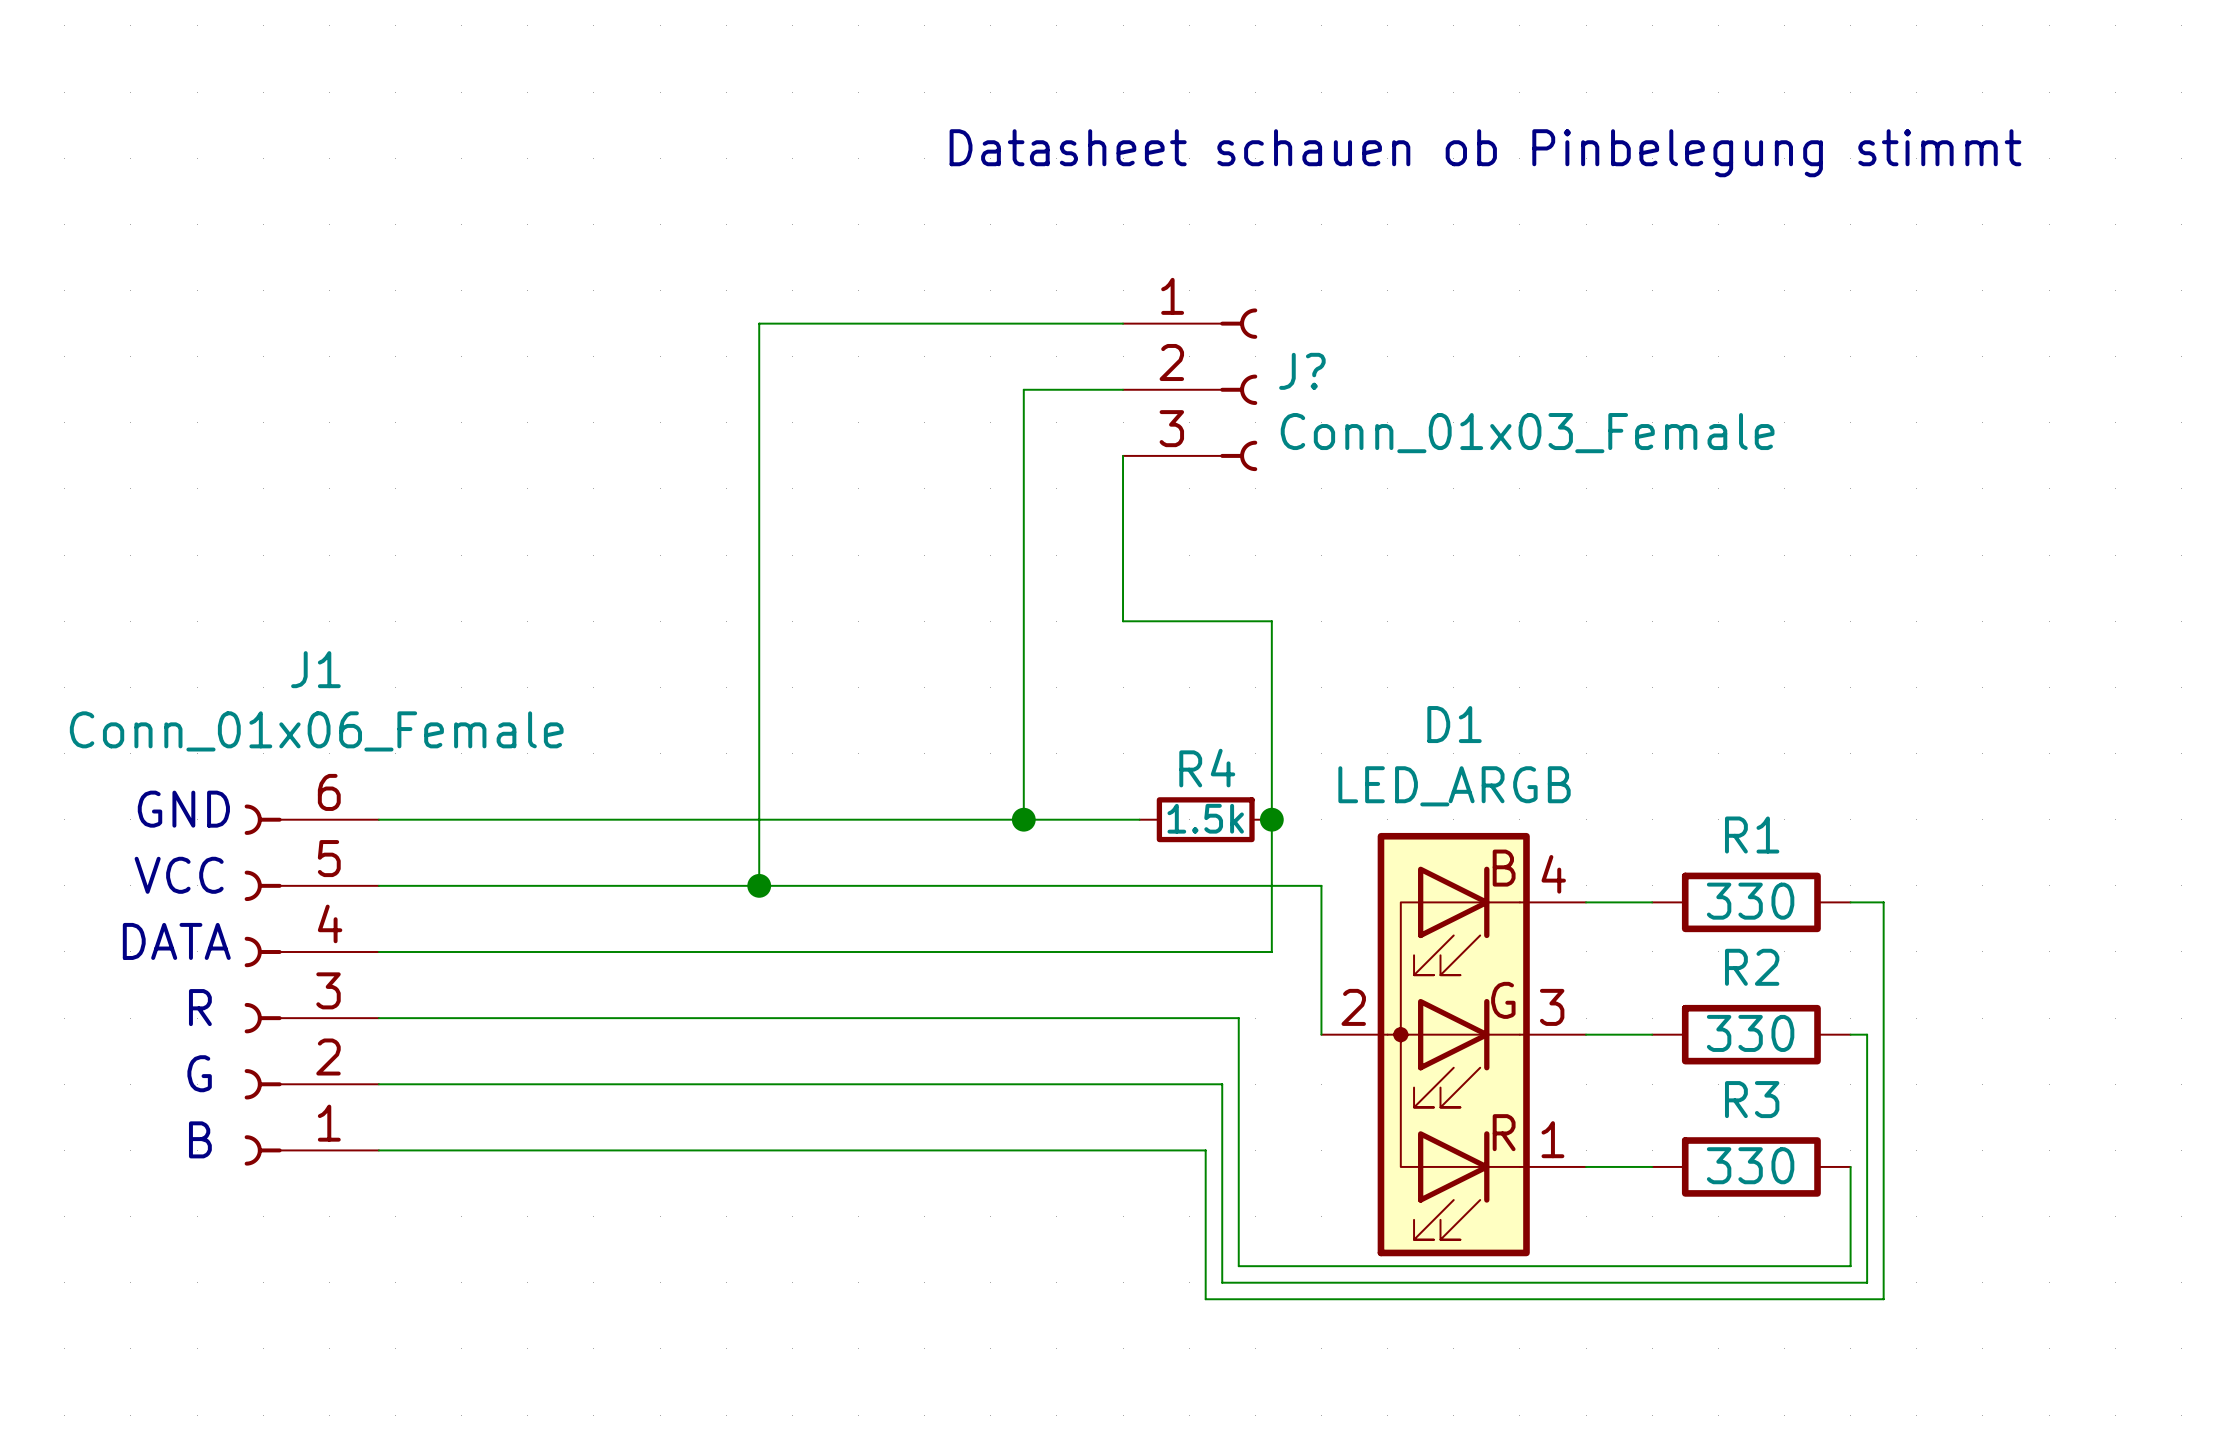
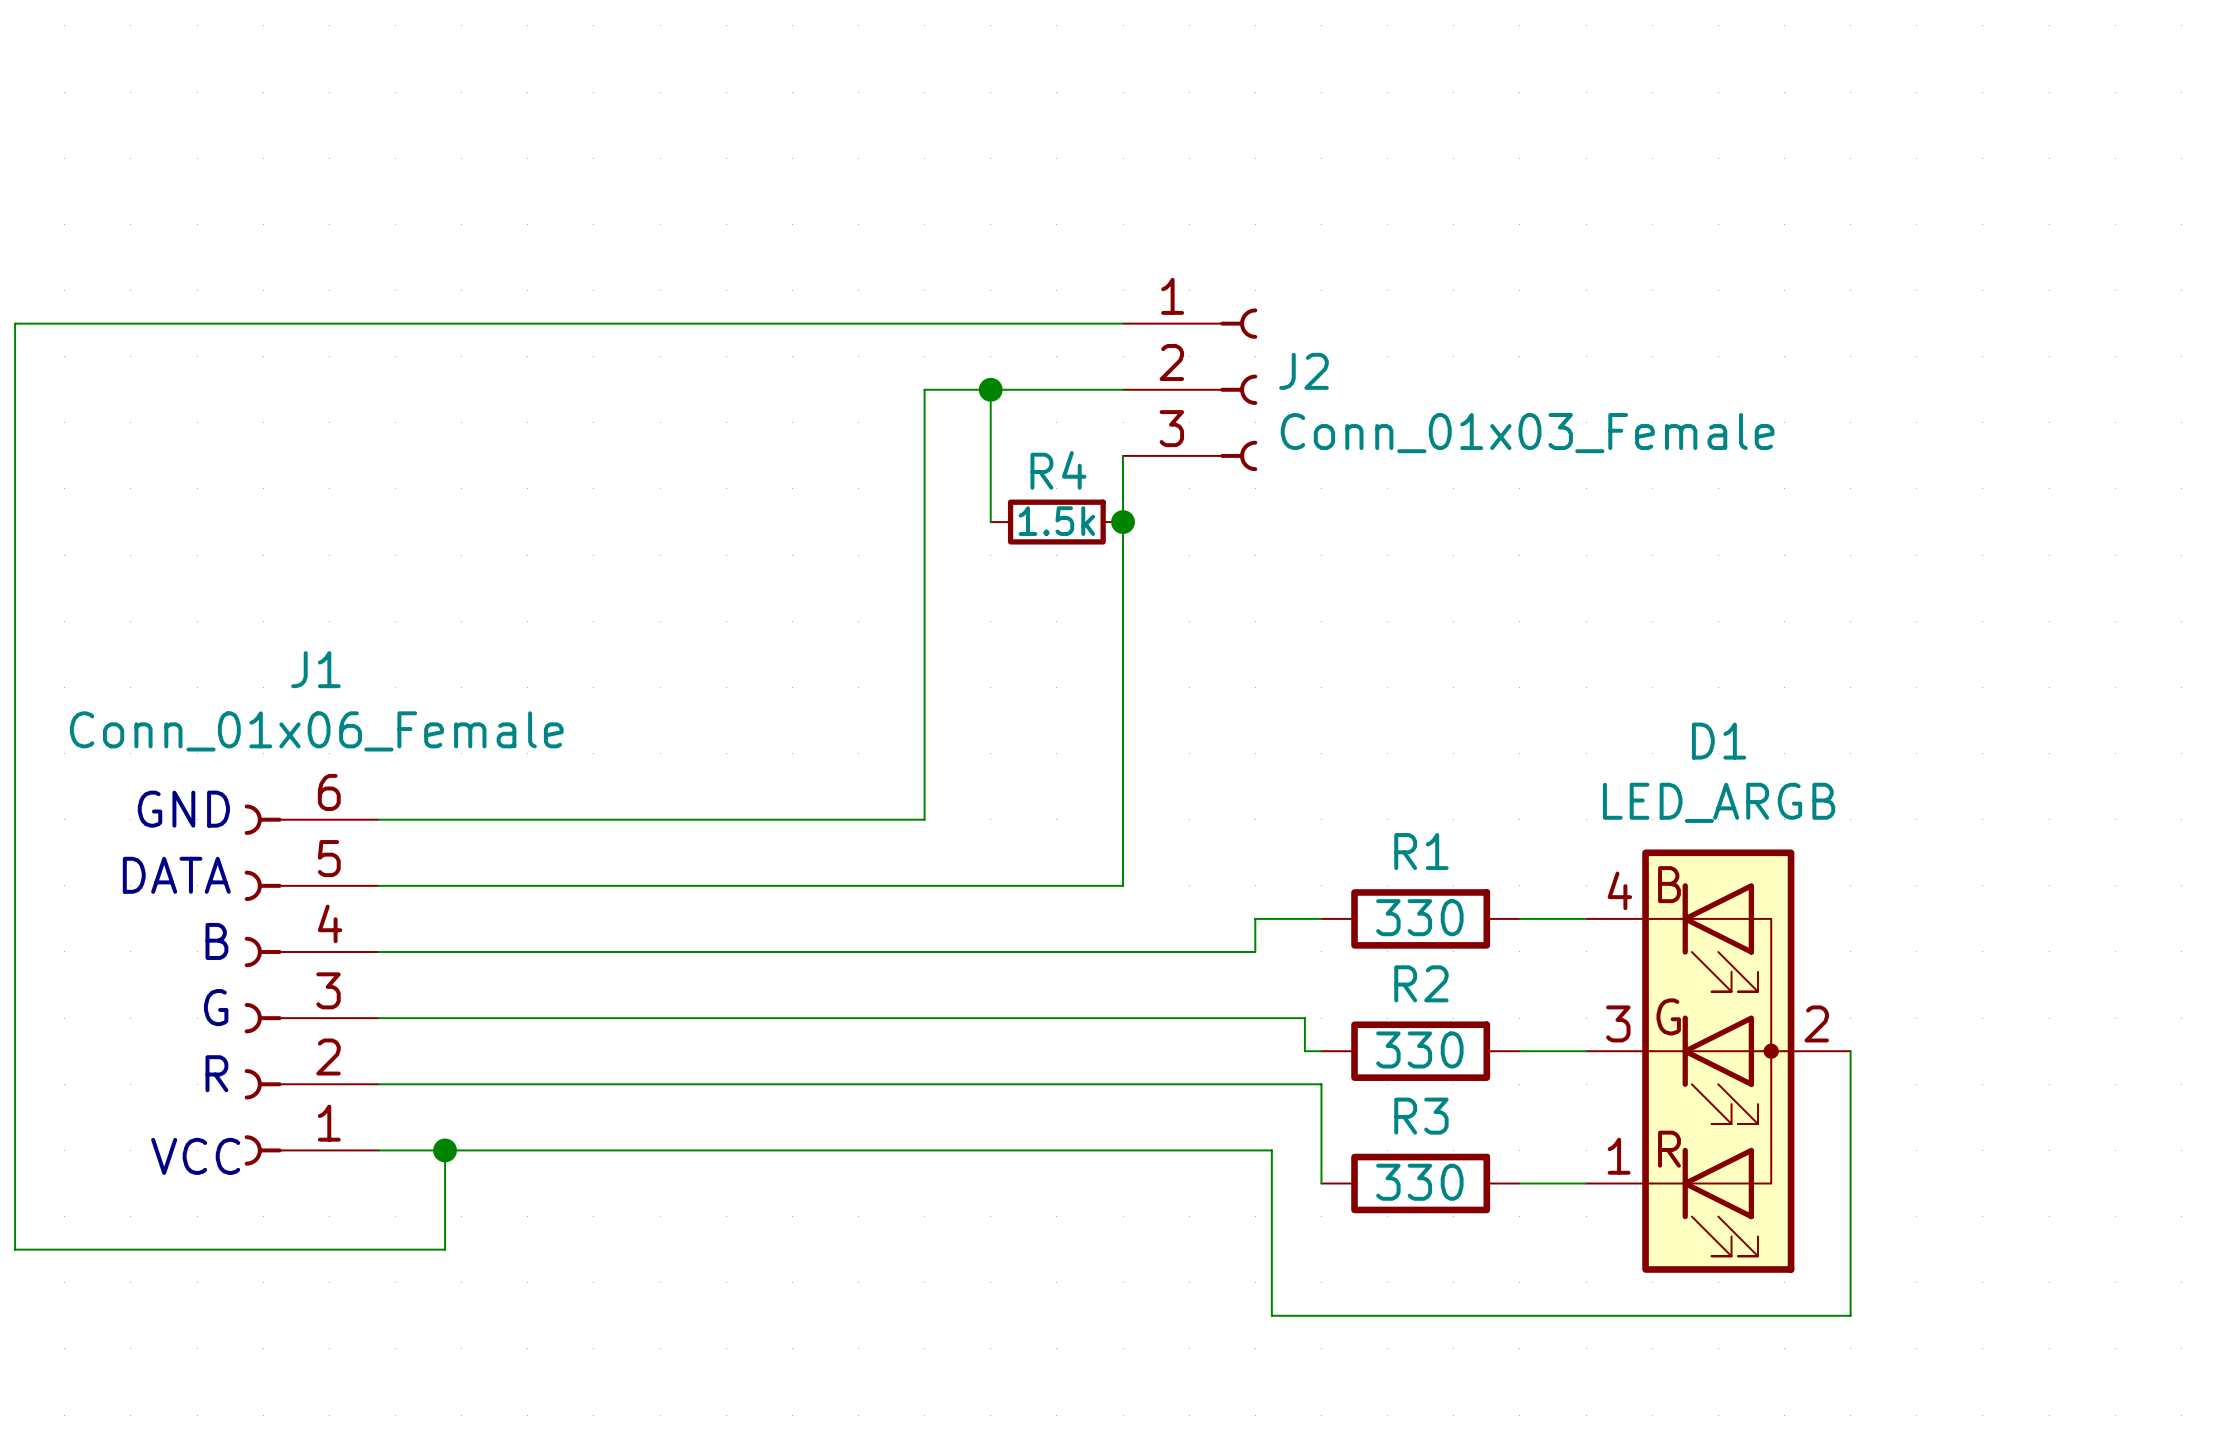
text: Datasheet schauen ob Pinbelegung stimmt (1485, 153) -> none
wire: (759, 323) (759, 885) -> (759, 323) (15, 323) (15, 1249) (445, 1249) (445, 1150)
J? name: J? (1302, 371) -> J2 (1303, 371)
wire: none -> (990, 389) (990, 522)
junction: none -> (990, 389)
wire: (1023, 389) (1023, 819) -> (1023, 389) (924, 389) (924, 819)
junction: none -> (1123, 522)
wire: (1123, 621) (1271, 621) (1271, 951) (1255, 951) -> (1123, 621) (1123, 885)
wire: (924, 819) (1139, 819) -> none
junction: (1023, 819) -> none
R4 position: (1205, 819) -> (1056, 522)
junction: (1271, 819) -> none
text position: VCC (179, 875) -> VCC (195, 1156)
junction: (759, 885) -> none
wire: (1123, 885) (1321, 885) (1321, 1034) -> none
wire: (1586, 902) (1652, 902) -> (1519, 918) (1586, 918)
R1 position: (1751, 902) -> (1420, 918)
wire: (1850, 902) (1883, 902) (1883, 1299) (1205, 1299) (1205, 1150) -> none
wire: none -> (1321, 918) (1255, 918) (1255, 951)
text position: DATA (176, 941) -> DATA (176, 875)
text position: R (200, 1007) -> R (216, 1073)
wire: (1238, 1018) (1238, 1266) (1850, 1266) -> (1205, 1150) (1271, 1150) (1271, 1315) (1850, 1315) (1850, 1266)
wire: none -> (1238, 1018) (1304, 1018) (1304, 1051) (1321, 1051)
wire: (1586, 1034) (1652, 1034) -> (1519, 1051) (1586, 1051)
R2 position: (1751, 1034) -> (1420, 1051)
wire: (1850, 1034) (1867, 1034) (1867, 1282) (1222, 1282) (1222, 1084) -> (1321, 1183) (1321, 1084) (1222, 1084)
D1 flip: as is (1453, 1044) -> left-right (1718, 1061)
D1 position: (1453, 1044) -> (1718, 1061)
wire: none -> (1850, 1051) (1850, 1166)
text position: G (199, 1073) -> G (216, 1007)
text position: B (200, 1139) -> B (216, 941)
junction: none -> (445, 1150)
wire: (1586, 1166) (1652, 1166) -> (1519, 1183) (1586, 1183)
R3 position: (1751, 1166) -> (1420, 1183)

